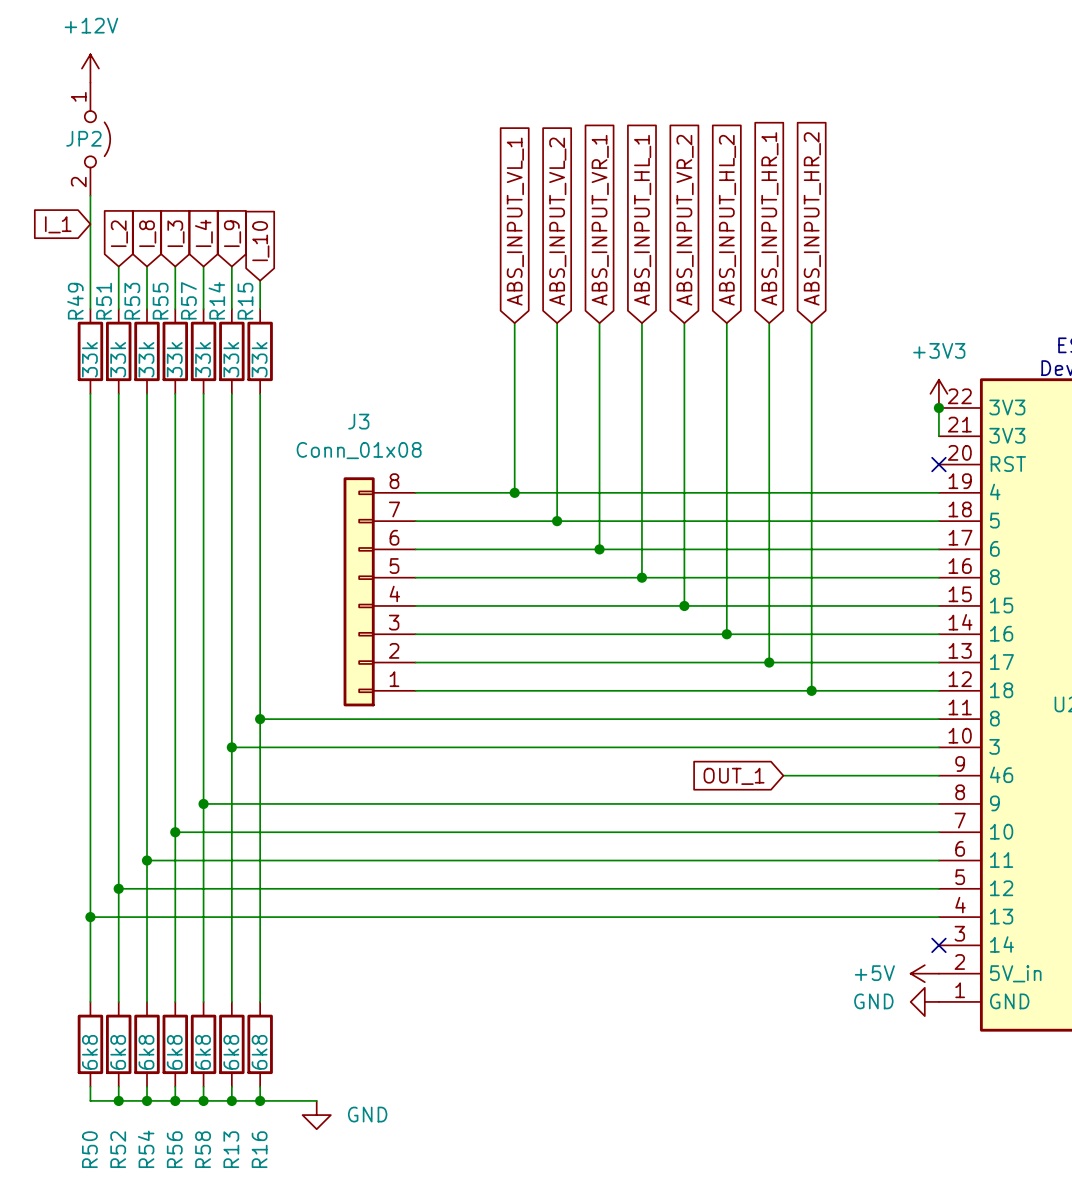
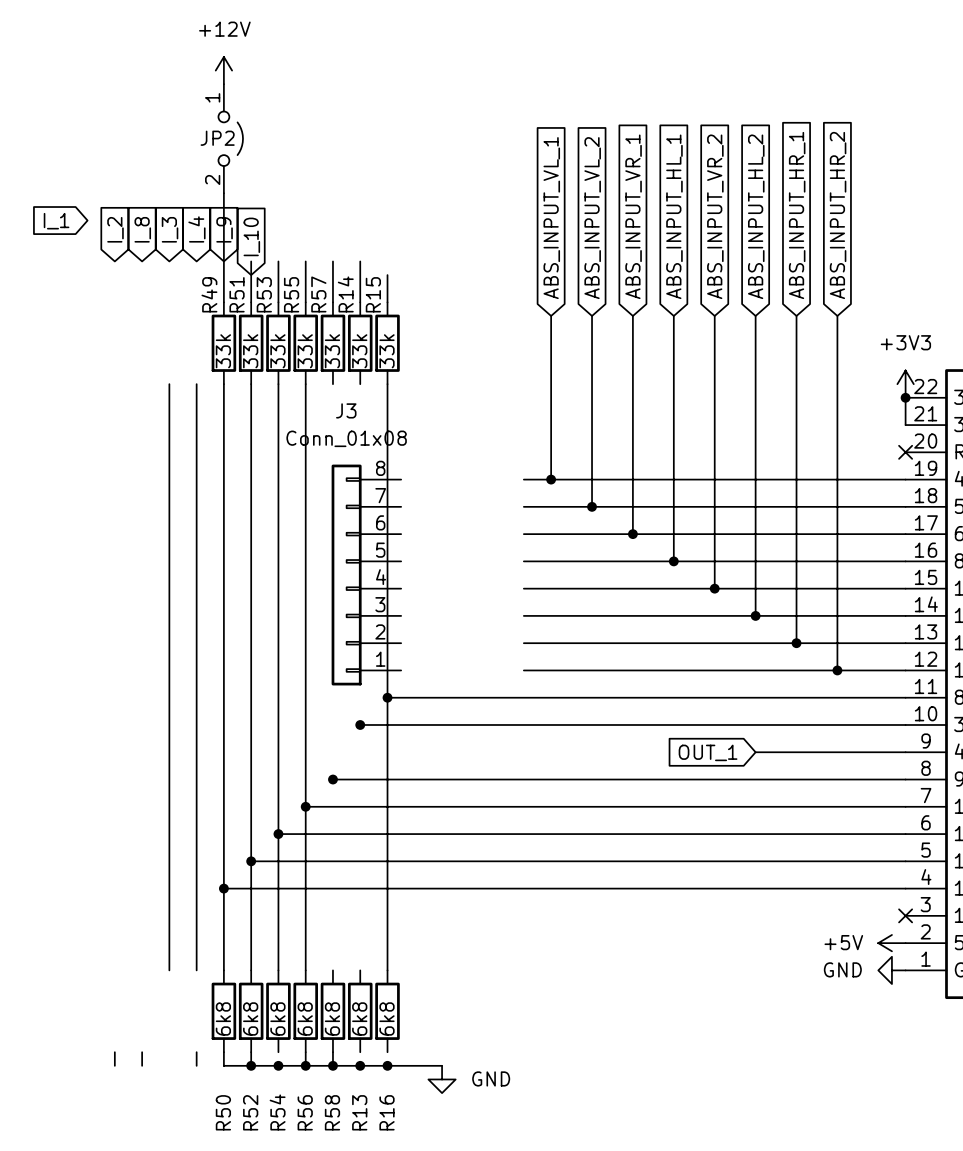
power symbol position: +12V (90, 68) -> +12V (223, 70)
JP2 position: (97, 139) -> (230, 138)
wire: (90, 195) (90, 308) -> none
wire: none -> (223, 193) (223, 261)
global label position: ABS_INPUT_HR_1 (769, 218) -> ABS_INPUT_HR_1 (797, 215)
global label position: ABS_INPUT_HR_2 (812, 218) -> ABS_INPUT_HR_2 (838, 215)
global label position: ABS_INPUT_VR_1 (600, 220) -> ABS_INPUT_VR_1 (633, 216)
global label position: ABS_INPUT_HL_1 (642, 220) -> ABS_INPUT_HL_1 (674, 216)
global label position: ABS_INPUT_VR_2 (685, 220) -> ABS_INPUT_VR_2 (715, 216)
global label position: ABS_INPUT_HL_2 (727, 220) -> ABS_INPUT_HL_2 (756, 216)
global label position: ABS_INPUT_VL_1 (515, 221) -> ABS_INPUT_VL_1 (551, 218)
global label position: ABS_INPUT_VL_2 (557, 221) -> ABS_INPUT_VL_2 (592, 218)
wire: (118, 266) (118, 308) -> (278, 261) (278, 302)
wire: (147, 266) (147, 308) -> (305, 261) (305, 302)
wire: (175, 266) (175, 308) -> (332, 261) (332, 302)
wire: (203, 266) (203, 308) -> (360, 261) (360, 302)
wire: none -> (251, 261) (251, 275)
wire: none -> (387, 275) (387, 302)
R14 name: R14 (216, 300) -> R49 (209, 294)
R15 name: R15 (245, 301) -> R51 (237, 294)
wire: (514, 323) (514, 492) -> (551, 315) (551, 479)
wire: (557, 323) (557, 521) -> (592, 315) (592, 506)
wire: (599, 323) (599, 549) -> (632, 315) (632, 534)
wire: (641, 323) (641, 577) -> (673, 315) (673, 561)
wire: (684, 323) (684, 605) -> (714, 315) (714, 588)
wire: (726, 323) (726, 634) -> (755, 315) (755, 615)
wire: (769, 323) (769, 662) -> (796, 315) (796, 643)
wire: (811, 323) (811, 690) -> (837, 315) (837, 670)
R49: 33k (90, 351) -> none
R51: 33k (118, 351) -> none
R53 position: (147, 351) -> (278, 343)
R55 position: (175, 351) -> (305, 343)
R57 position: (203, 351) -> (332, 343)
R14: none -> 33k (360, 343)
R15: none -> 33k (387, 343)
wire: (90, 393) (90, 1001) -> none
wire: (118, 393) (118, 1001) -> (278, 384) (278, 970)
wire: (147, 393) (147, 1001) -> (305, 384) (305, 970)
wire: none -> (387, 384) (387, 970)
wire: (415, 492) (542, 492) -> none
junction: (514, 492) -> none
junction: none -> (551, 479)
wire: (415, 521) (542, 521) -> none
junction: (557, 521) -> none
junction: none -> (592, 506)
wire: (415, 549) (542, 549) -> none
junction: (599, 549) -> none
junction: none -> (632, 534)
wire: (415, 577) (542, 577) -> none
junction: (641, 577) -> none
junction: none -> (673, 561)
wire: (415, 605) (542, 605) -> none
junction: (684, 605) -> none
junction: none -> (714, 588)
wire: (415, 634) (542, 634) -> none
junction: (726, 634) -> none
junction: none -> (755, 615)
wire: (415, 662) (542, 662) -> none
junction: (769, 662) -> none
junction: none -> (796, 643)
wire: (415, 690) (542, 690) -> none
junction: (811, 690) -> none
junction: none -> (837, 670)
wire: (260, 719) (401, 719) -> none
junction: (260, 719) -> none
junction: none -> (387, 697)
wire: (231, 747) (373, 747) -> none
junction: (231, 747) -> none
junction: none -> (360, 724)
wire: (203, 803) (344, 803) -> none
junction: (203, 803) -> none
junction: none -> (332, 779)
wire: (175, 832) (316, 832) -> none
junction: (175, 832) -> none
junction: none -> (305, 806)
wire: (147, 860) (288, 860) -> none
junction: (147, 860) -> none
junction: none -> (278, 834)
wire: (118, 888) (260, 888) -> none
junction: (118, 888) -> none
junction: none -> (251, 861)
wire: (90, 917) (231, 917) -> none
junction: (90, 917) -> none
junction: none -> (223, 888)
R50: 6k8 (90, 1044) -> none
R52: 6k8 (118, 1044) -> none
R54 position: (147, 1044) -> (278, 1011)
R56 position: (175, 1044) -> (305, 1011)
R58 position: (203, 1044) -> (332, 1011)
R13: none -> 6k8 (360, 1011)
R16: none -> 6k8 (387, 1011)
wire: (90, 1086) (90, 1100) (231, 1100) -> (305, 1052) (305, 1065) (442, 1065)
wire: (175, 1086) (175, 1100) -> (332, 1052) (332, 1065)
junction: (118, 1100) -> none
junction: (147, 1100) -> none
junction: (175, 1100) -> none
junction: (203, 1100) -> none
junction: (231, 1100) -> none
junction: none -> (278, 1065)
junction: none -> (305, 1065)
junction: none -> (332, 1065)
junction: none -> (360, 1065)
junction: none -> (387, 1065)
power symbol position: GND (316, 1115) -> GND (442, 1079)
R13 name: R13 (231, 1149) -> R50 (223, 1112)
R16 name: R16 (259, 1149) -> R52 (250, 1112)

